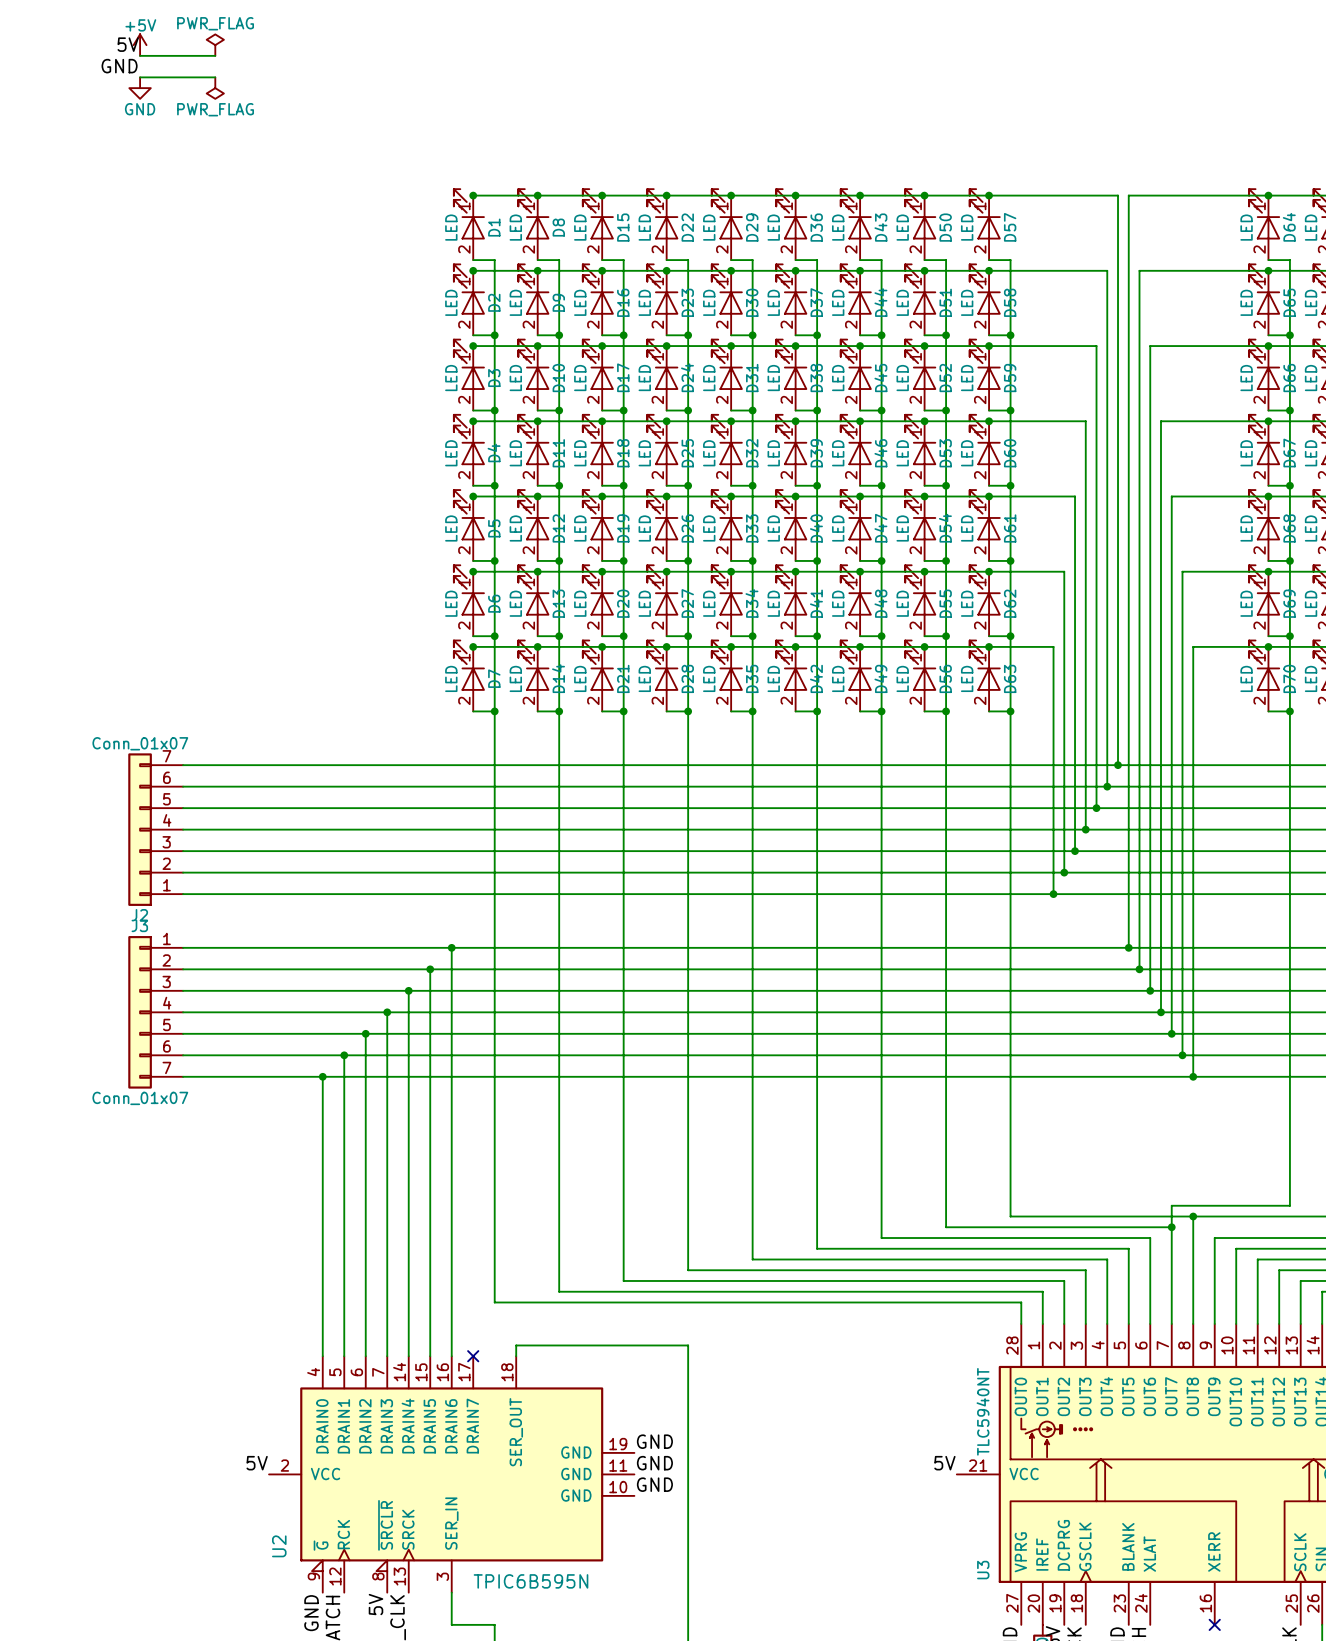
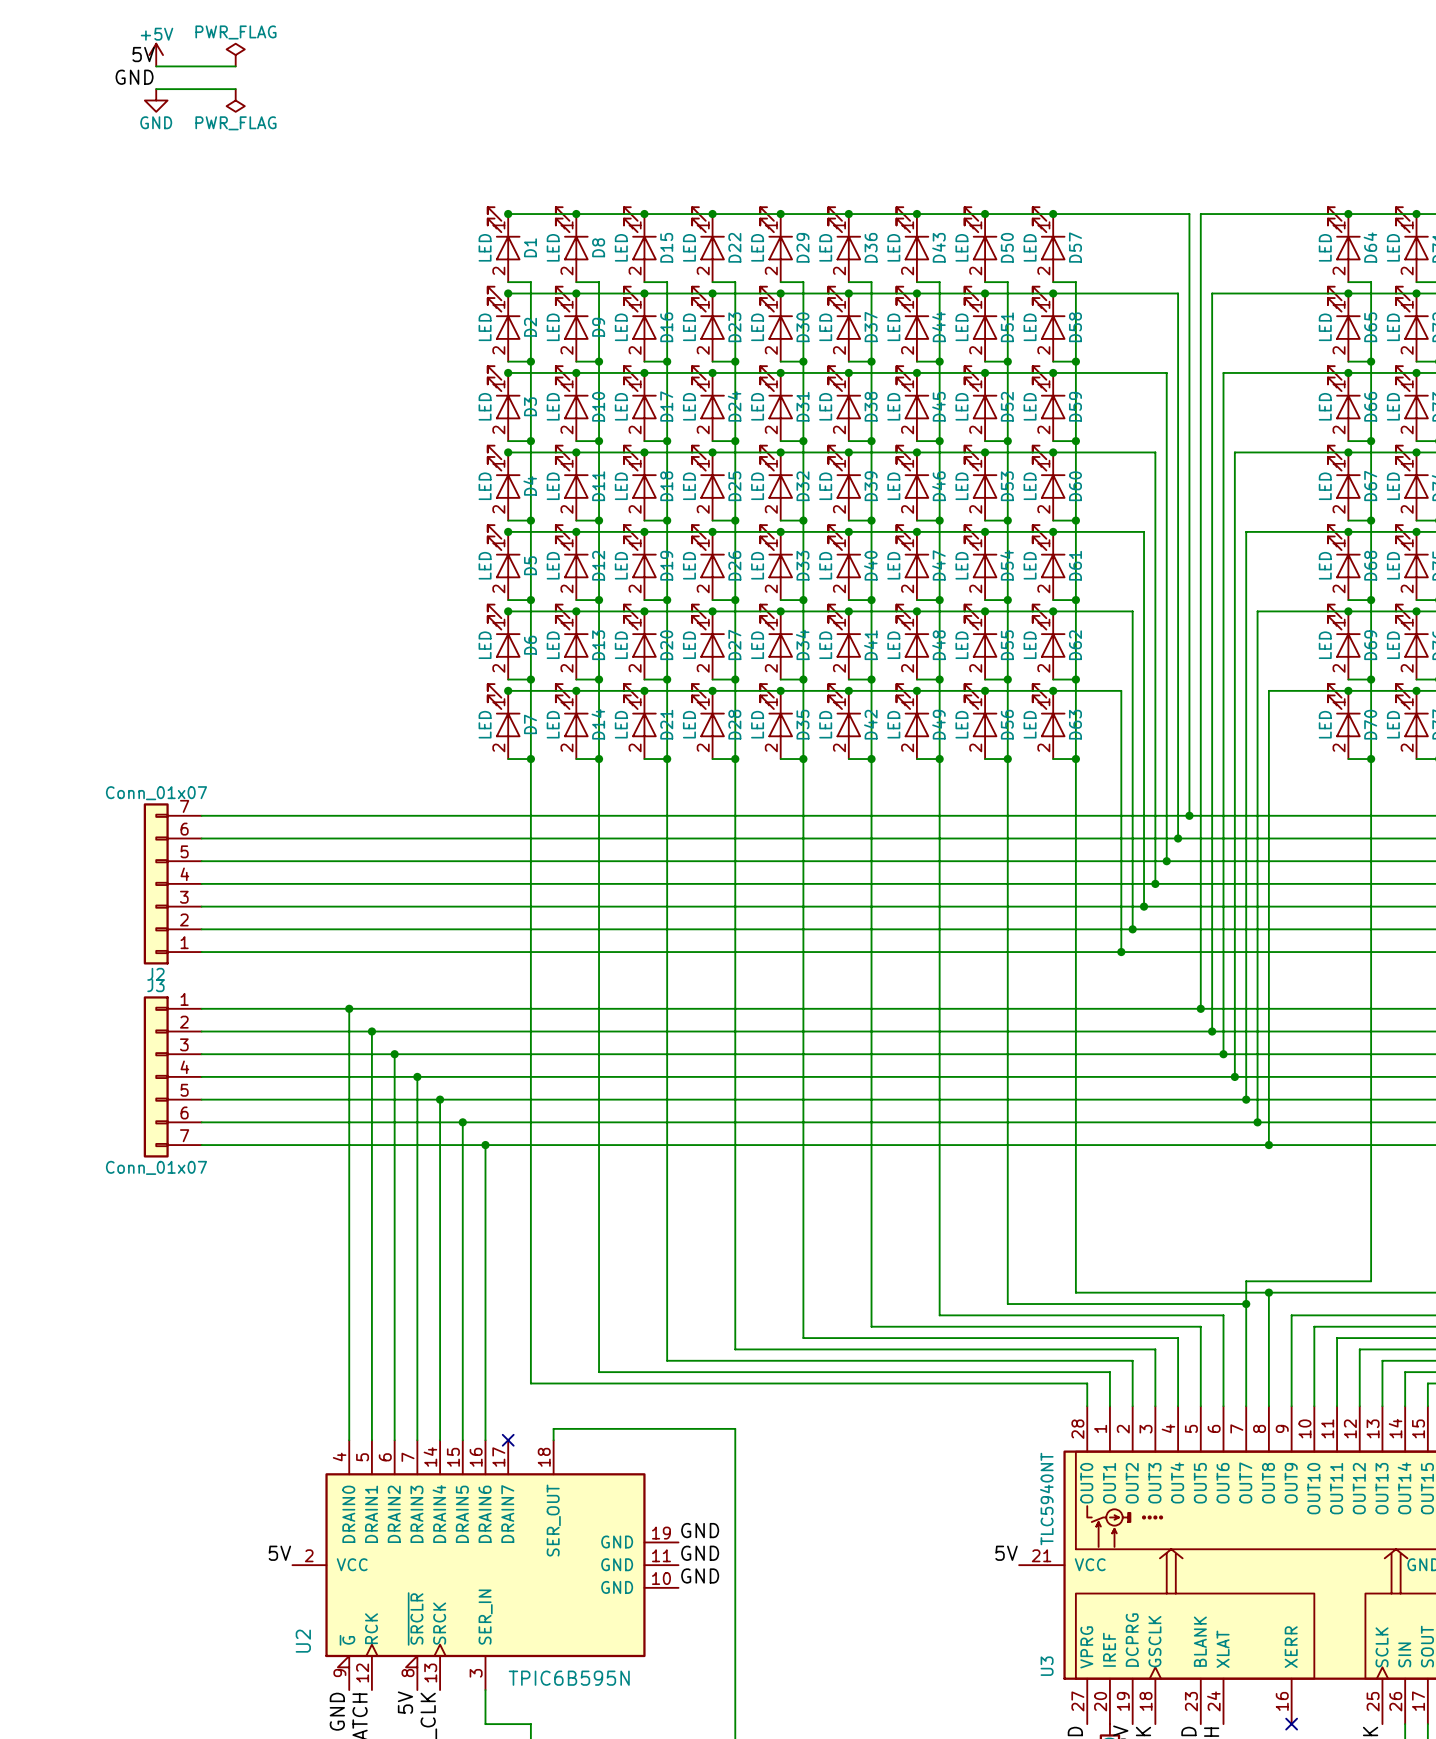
junction: none -> (349, 1008)
wire: (451, 947) (451, 1076) -> (349, 1008) (349, 1145)
junction: (451, 947) -> none
junction: none -> (371, 1031)
wire: (430, 969) (430, 1055) -> (371, 1031) (371, 1122)
junction: (430, 969) -> none
junction: none -> (394, 1054)
wire: (408, 990) (408, 1033) -> (394, 1054) (394, 1099)
junction: (408, 990) -> none
junction: (365, 1033) -> none
junction: none -> (440, 1099)
junction: (344, 1055) -> none
junction: none -> (462, 1122)
junction: (322, 1076) -> none
junction: none -> (485, 1145)

